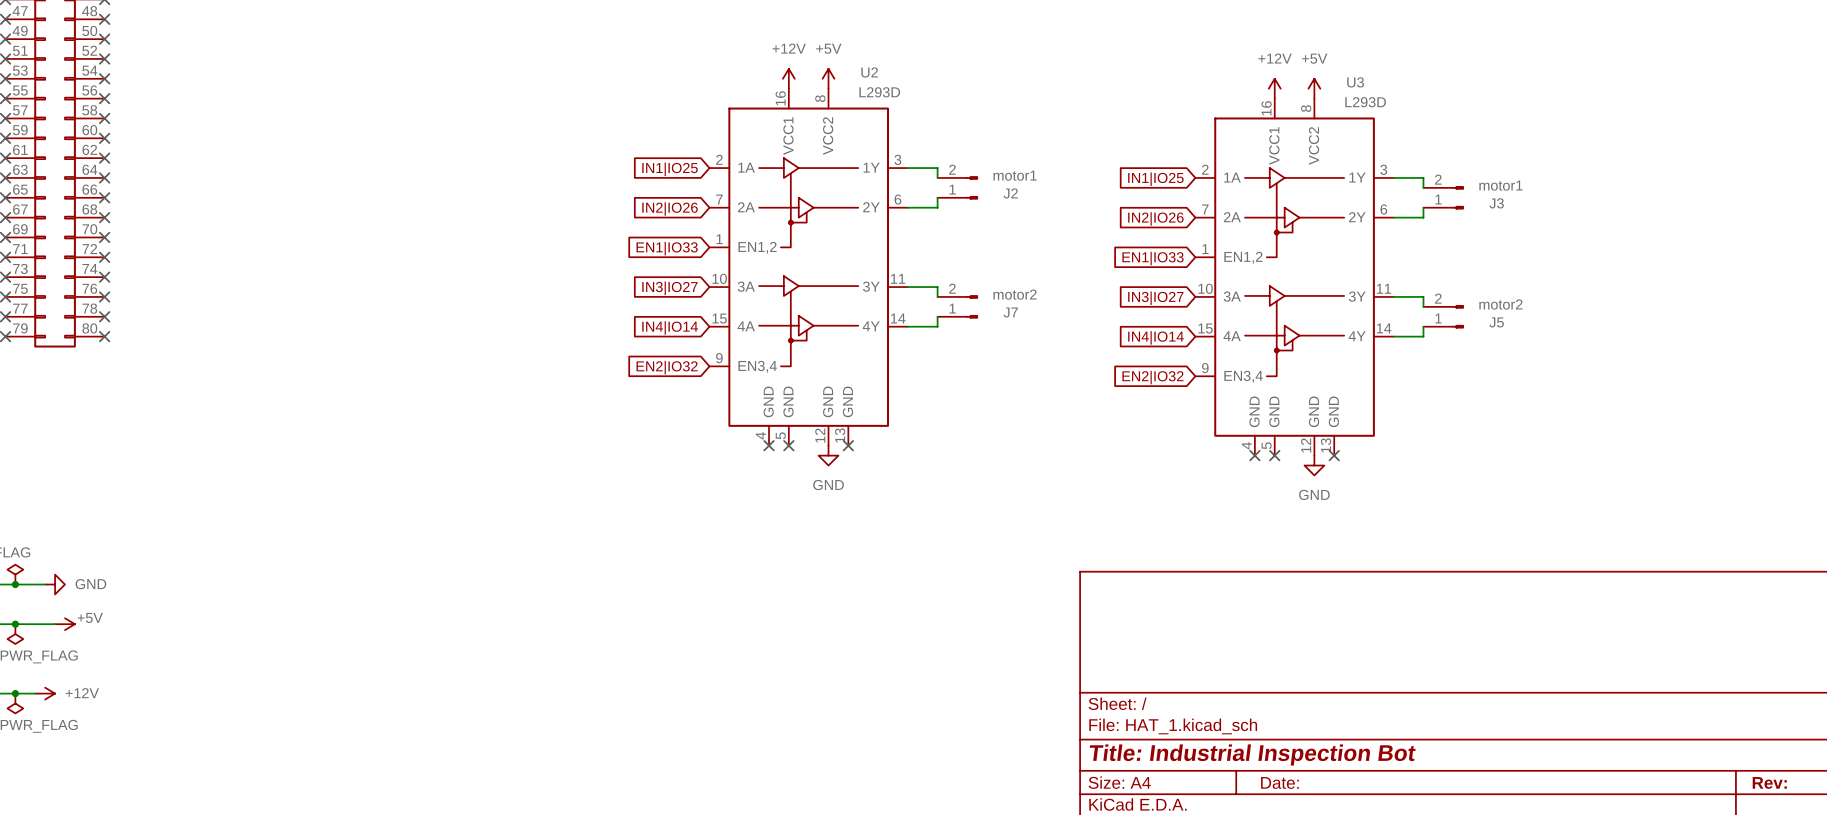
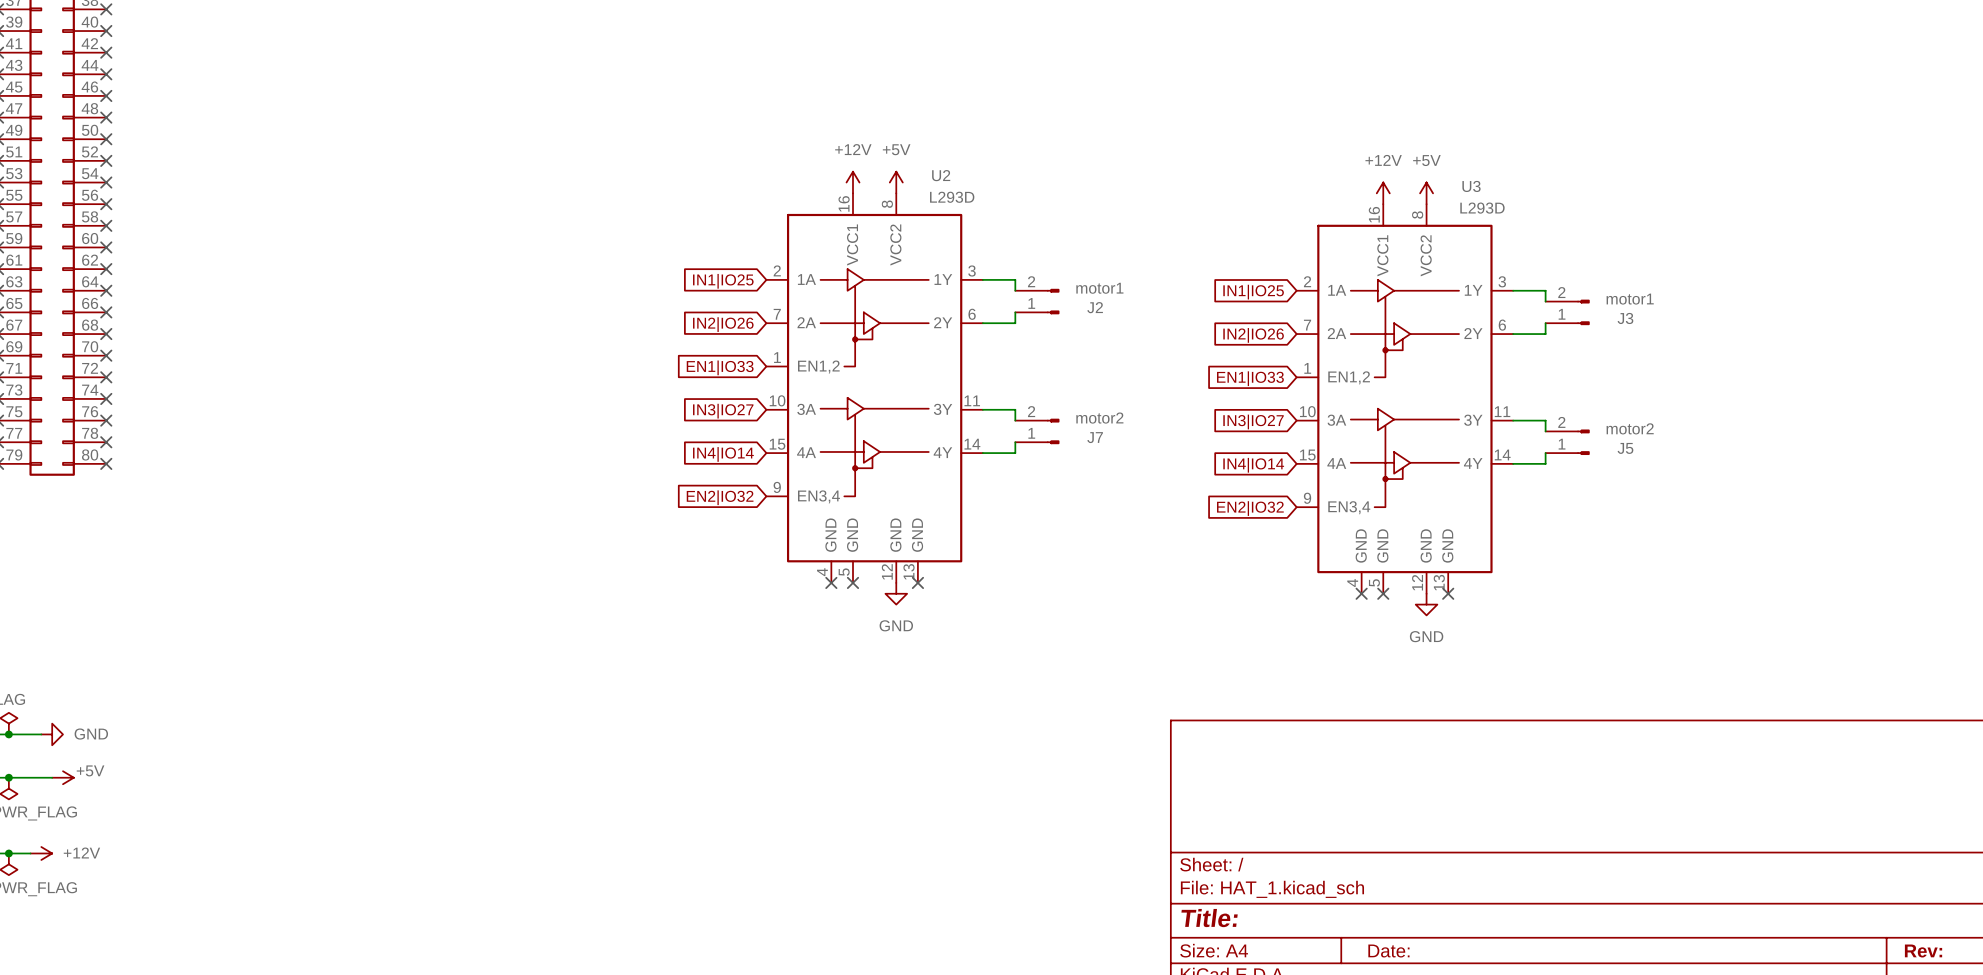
title block: Title: Industrial Inspection Bot (1252, 754) -> Title: (1209, 918)

